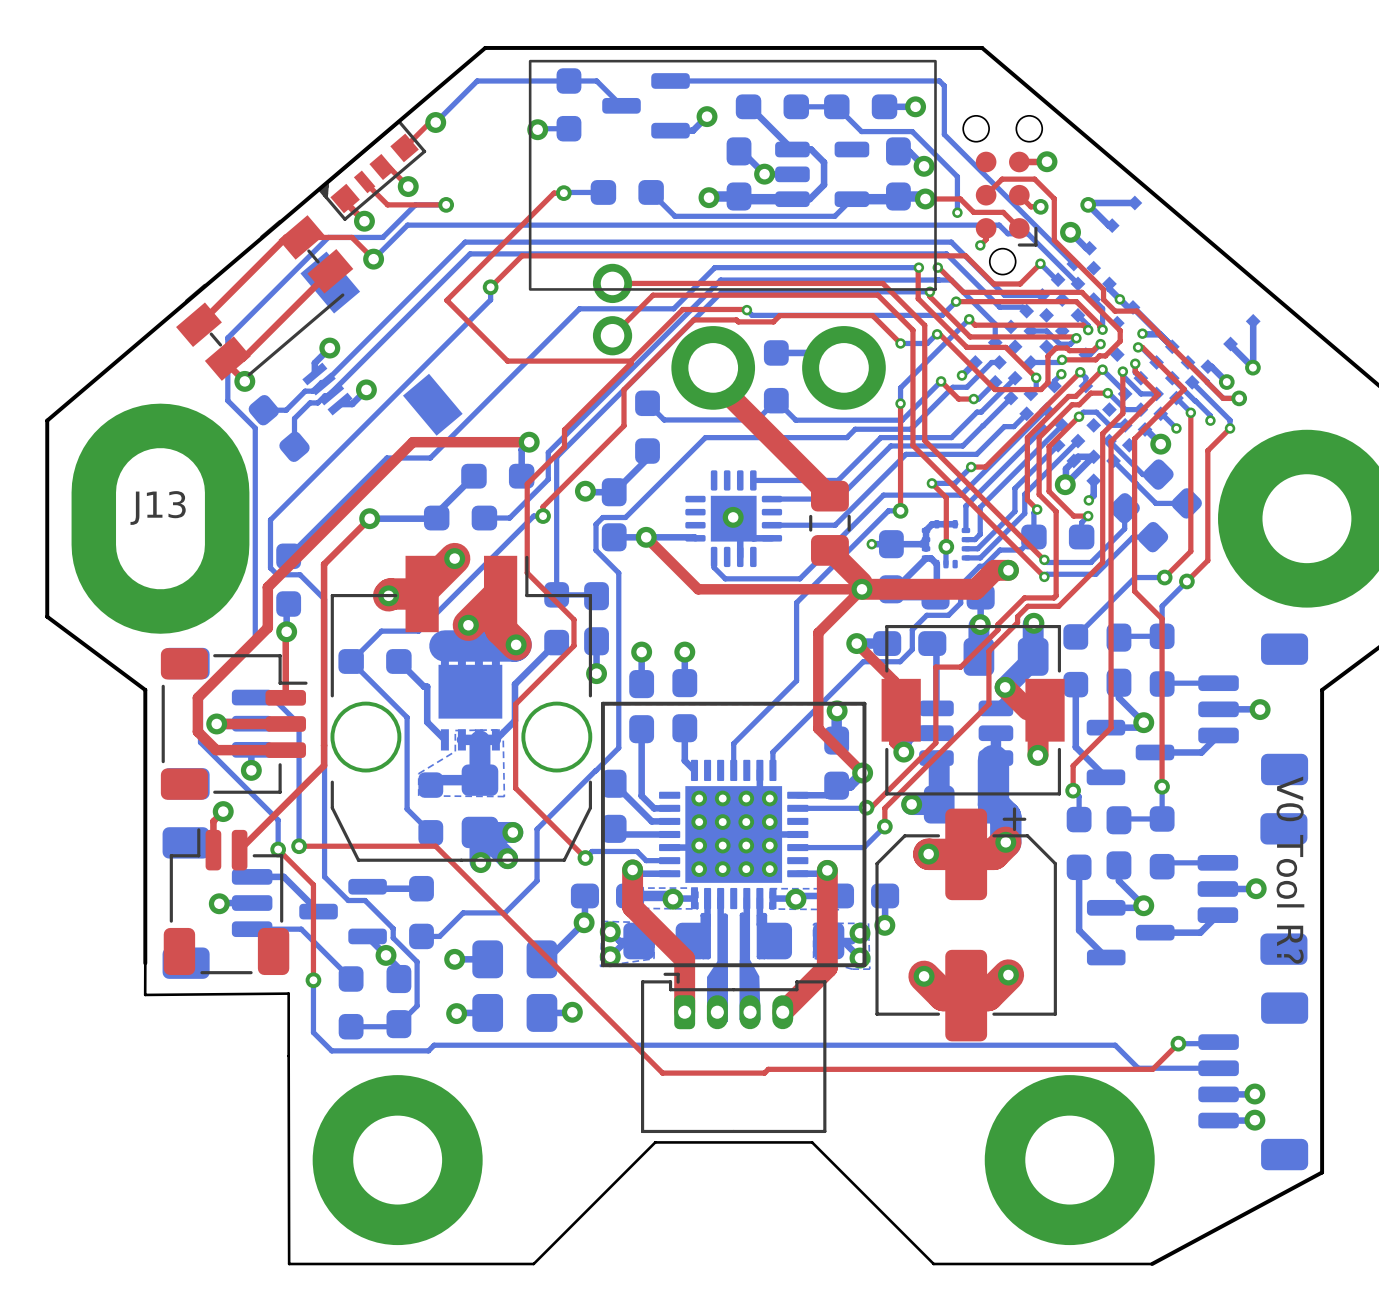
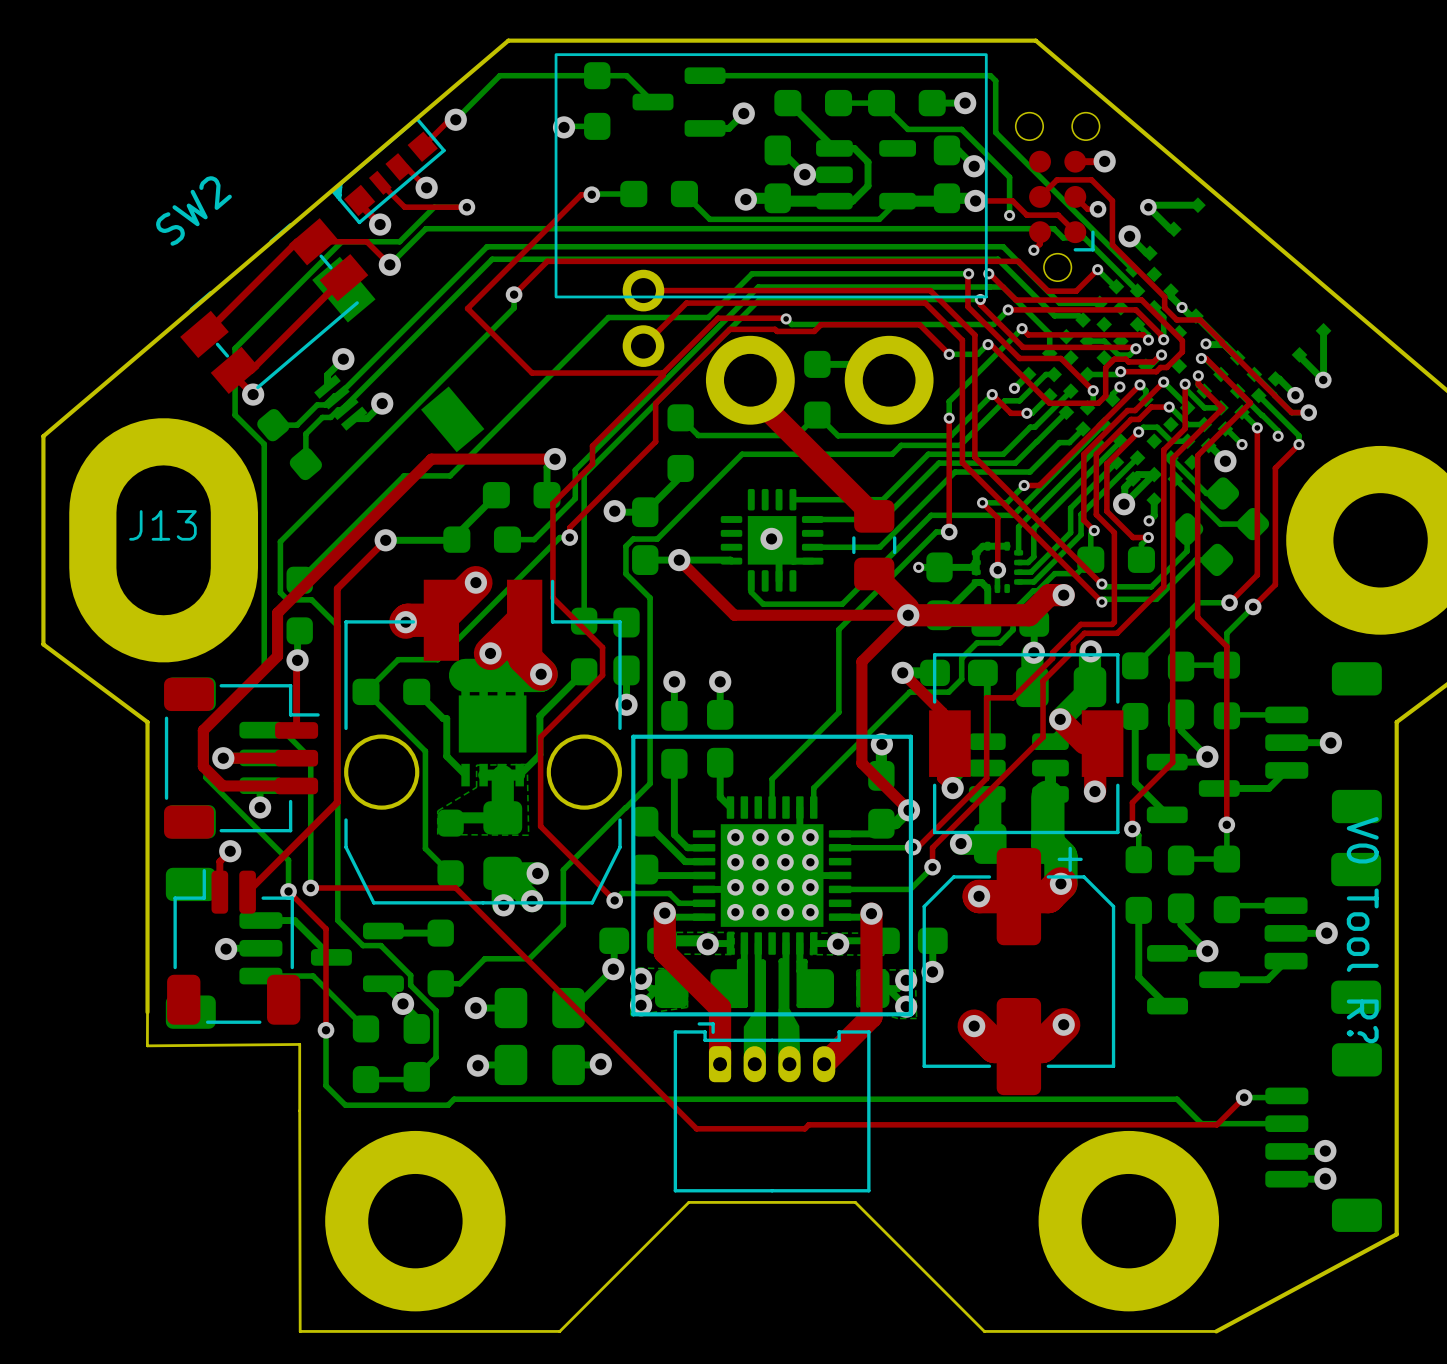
SW2 name: none -> SW2 (193, 211)

